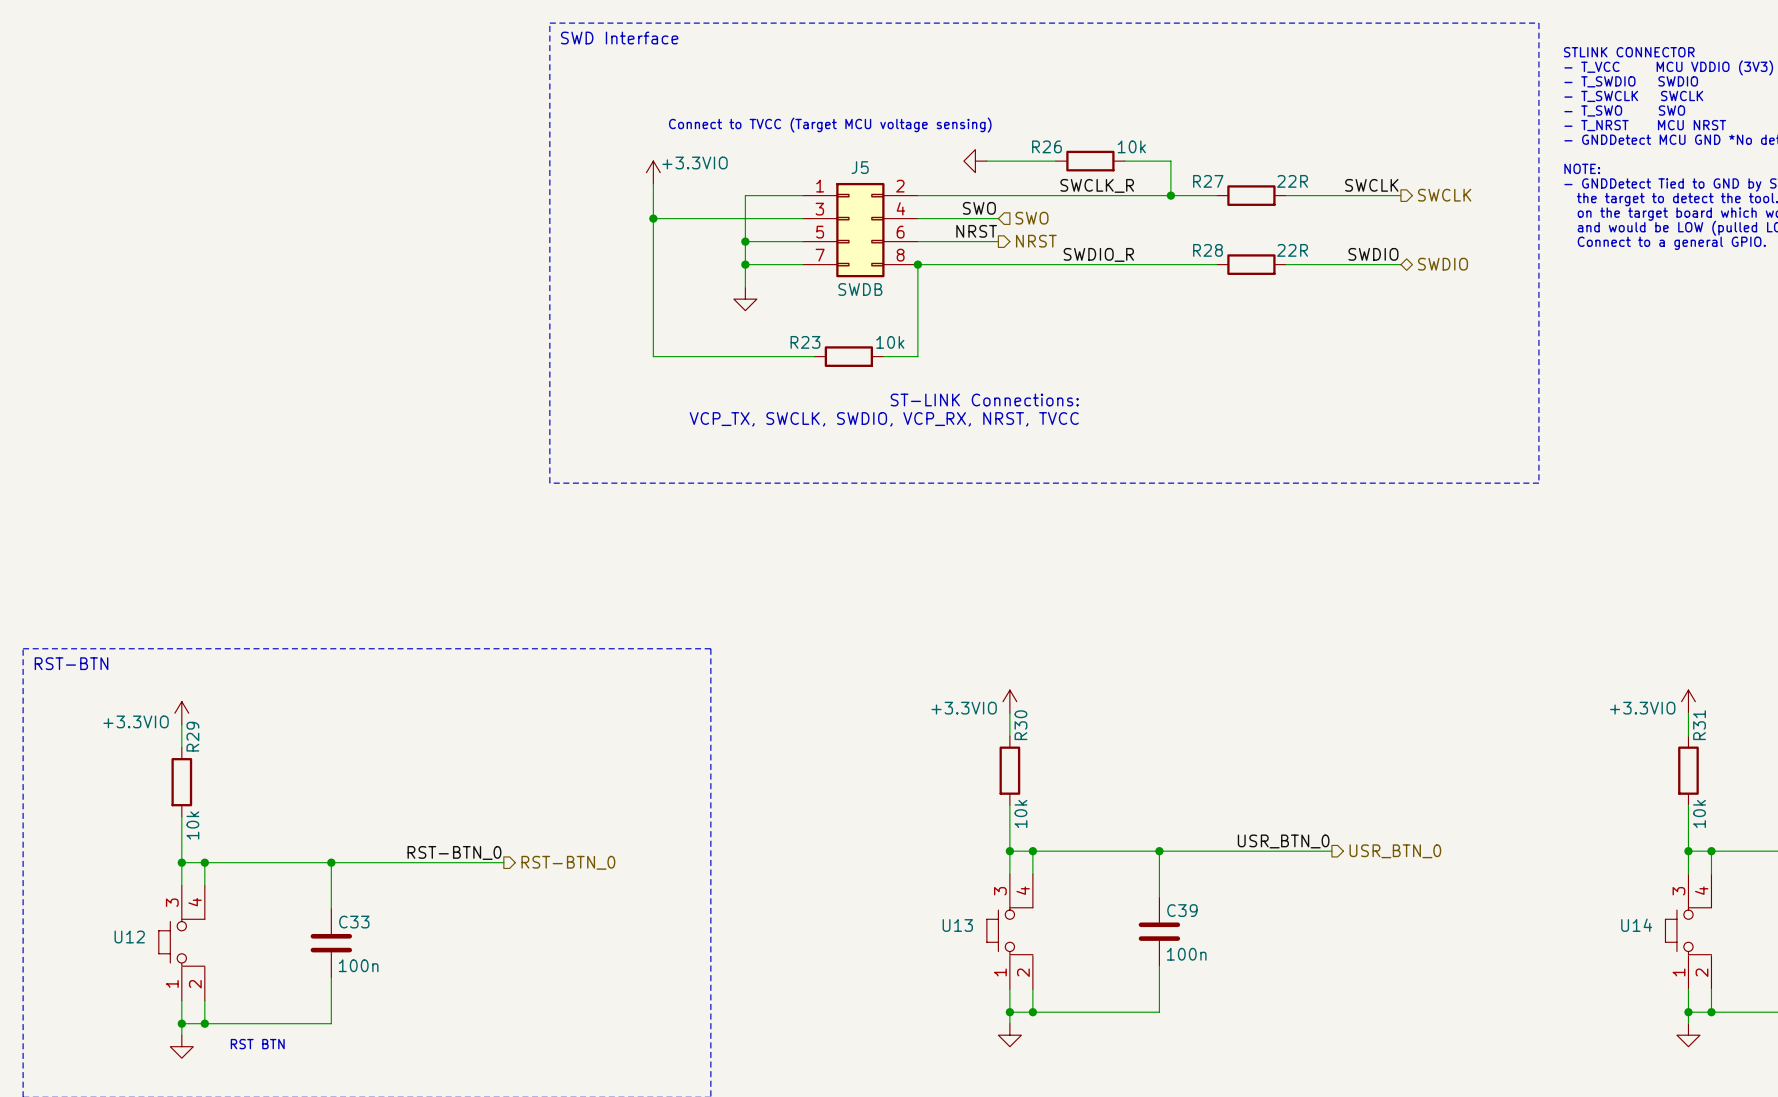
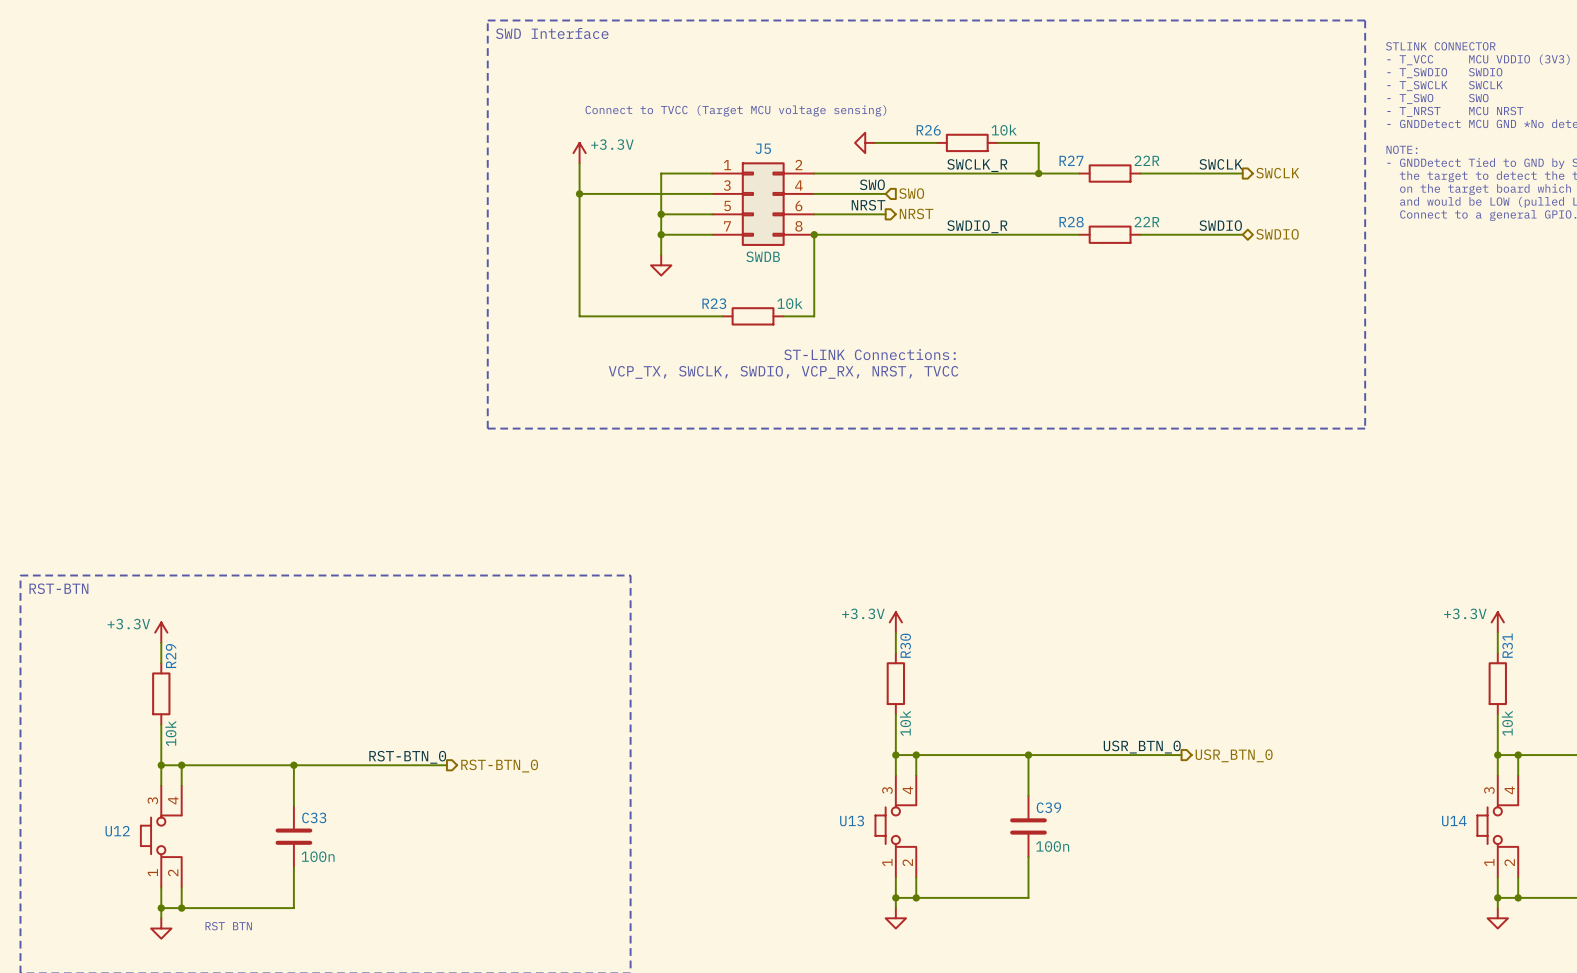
power symbol: +3.3VIO (653, 172) -> +3.3V (579, 153)
power symbol: +3.3VIO (1009, 701) -> +3.3V (895, 622)
power symbol: +3.3VIO (1688, 701) -> +3.3V (1497, 622)
power symbol: +3.3VIO (181, 713) -> +3.3V (161, 632)

